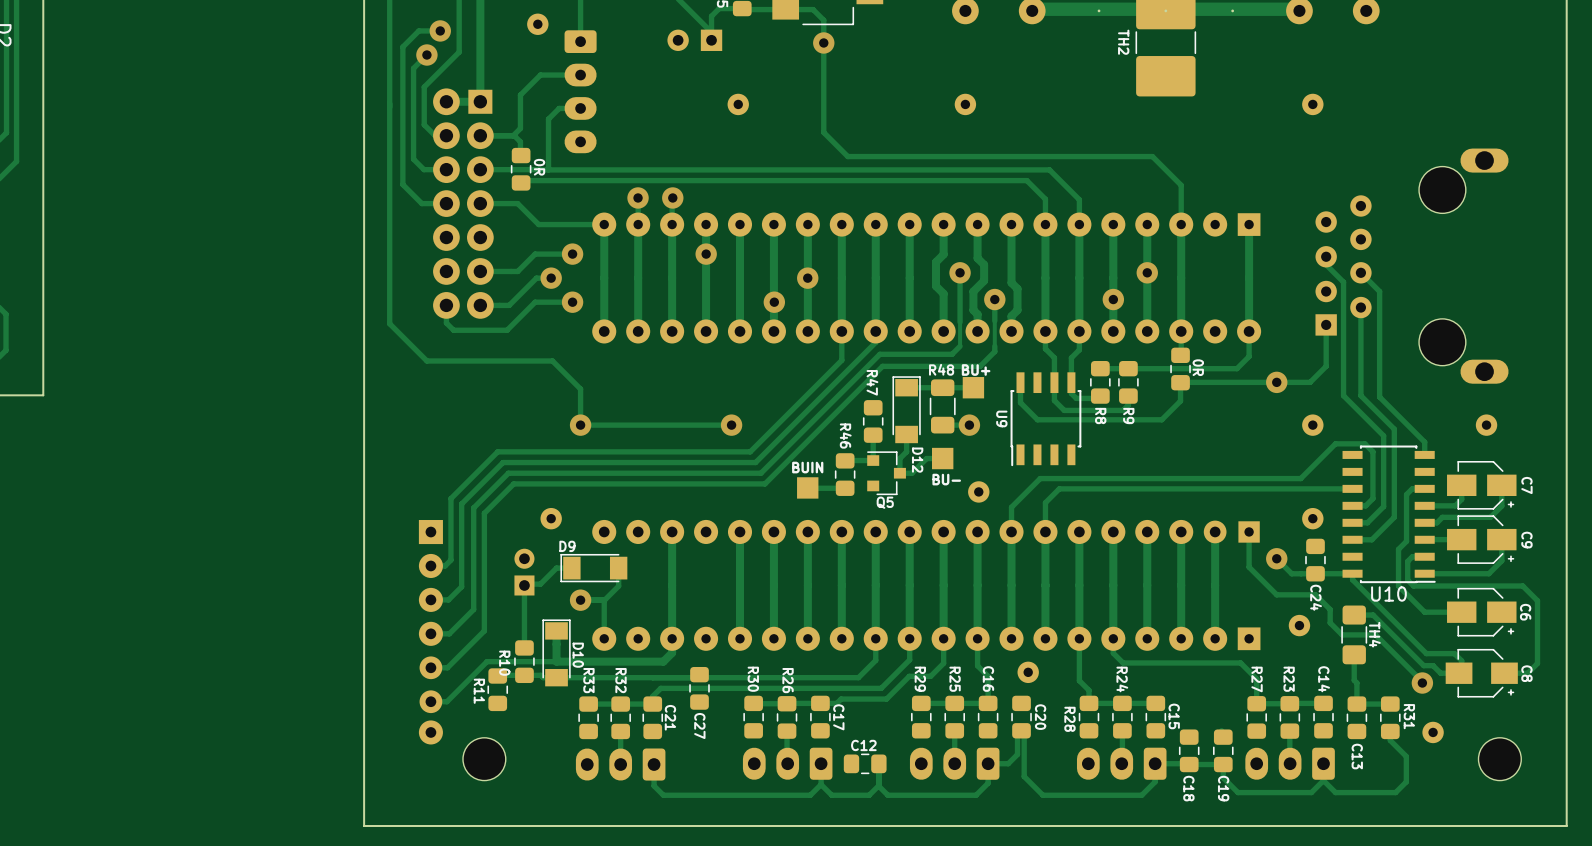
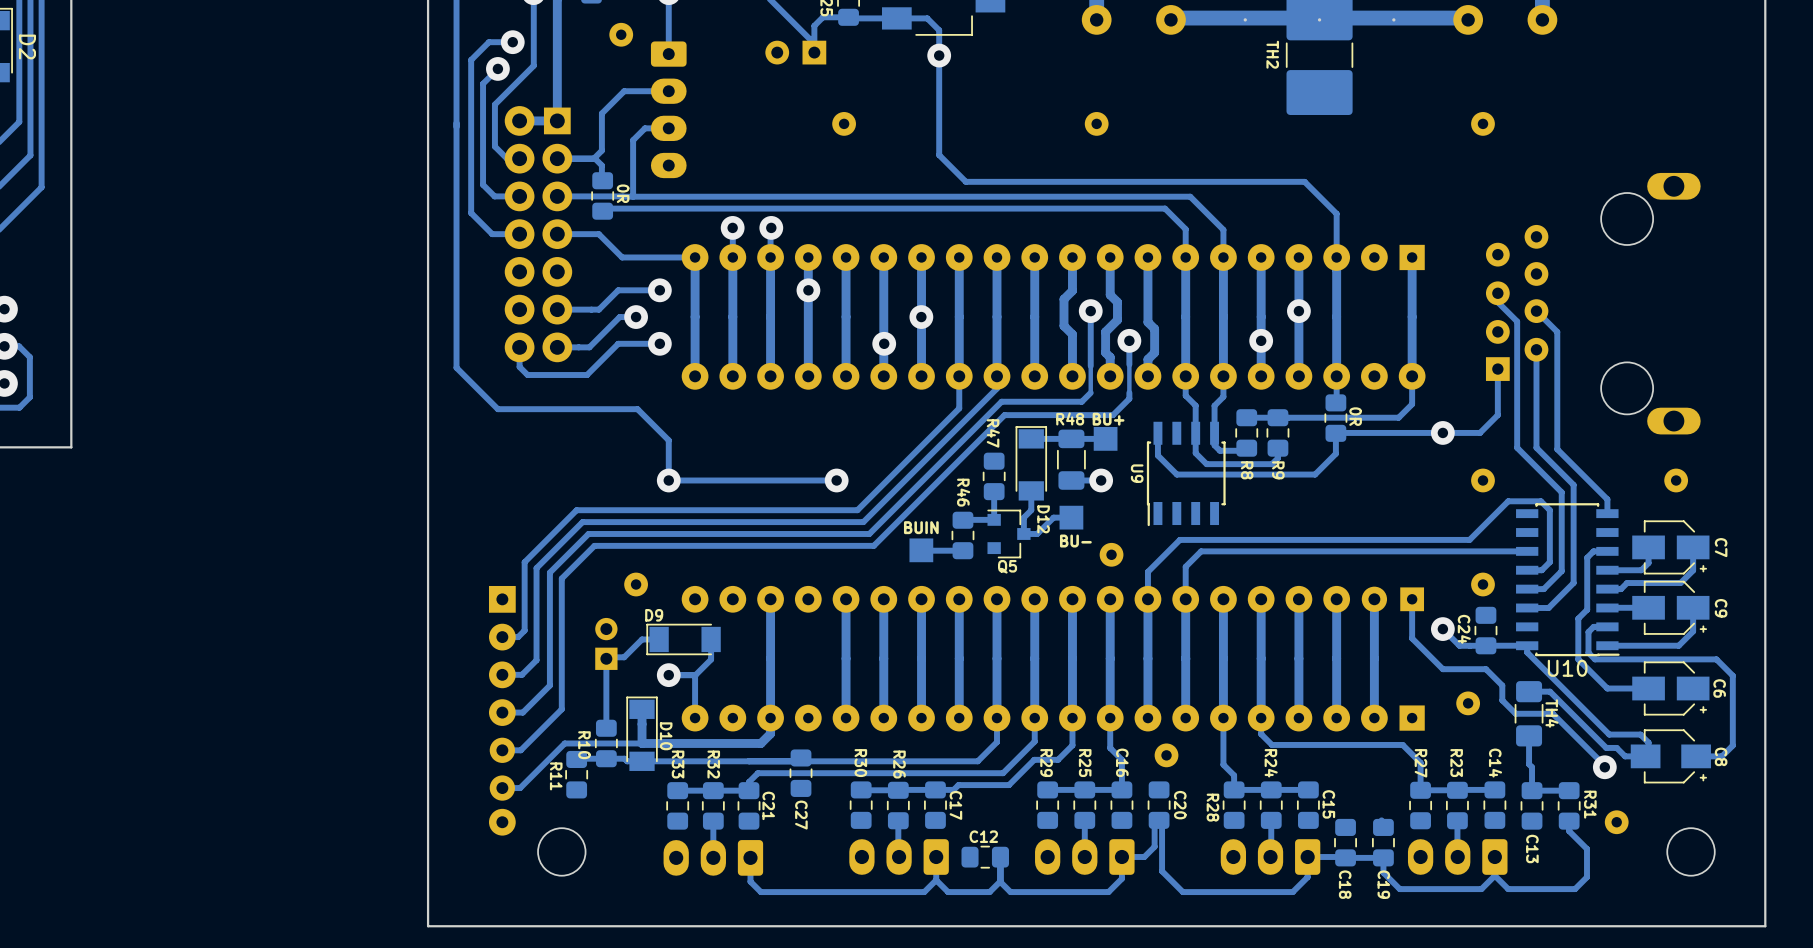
C24 name position: C24 (1316, 597) -> C24 (1464, 629)

